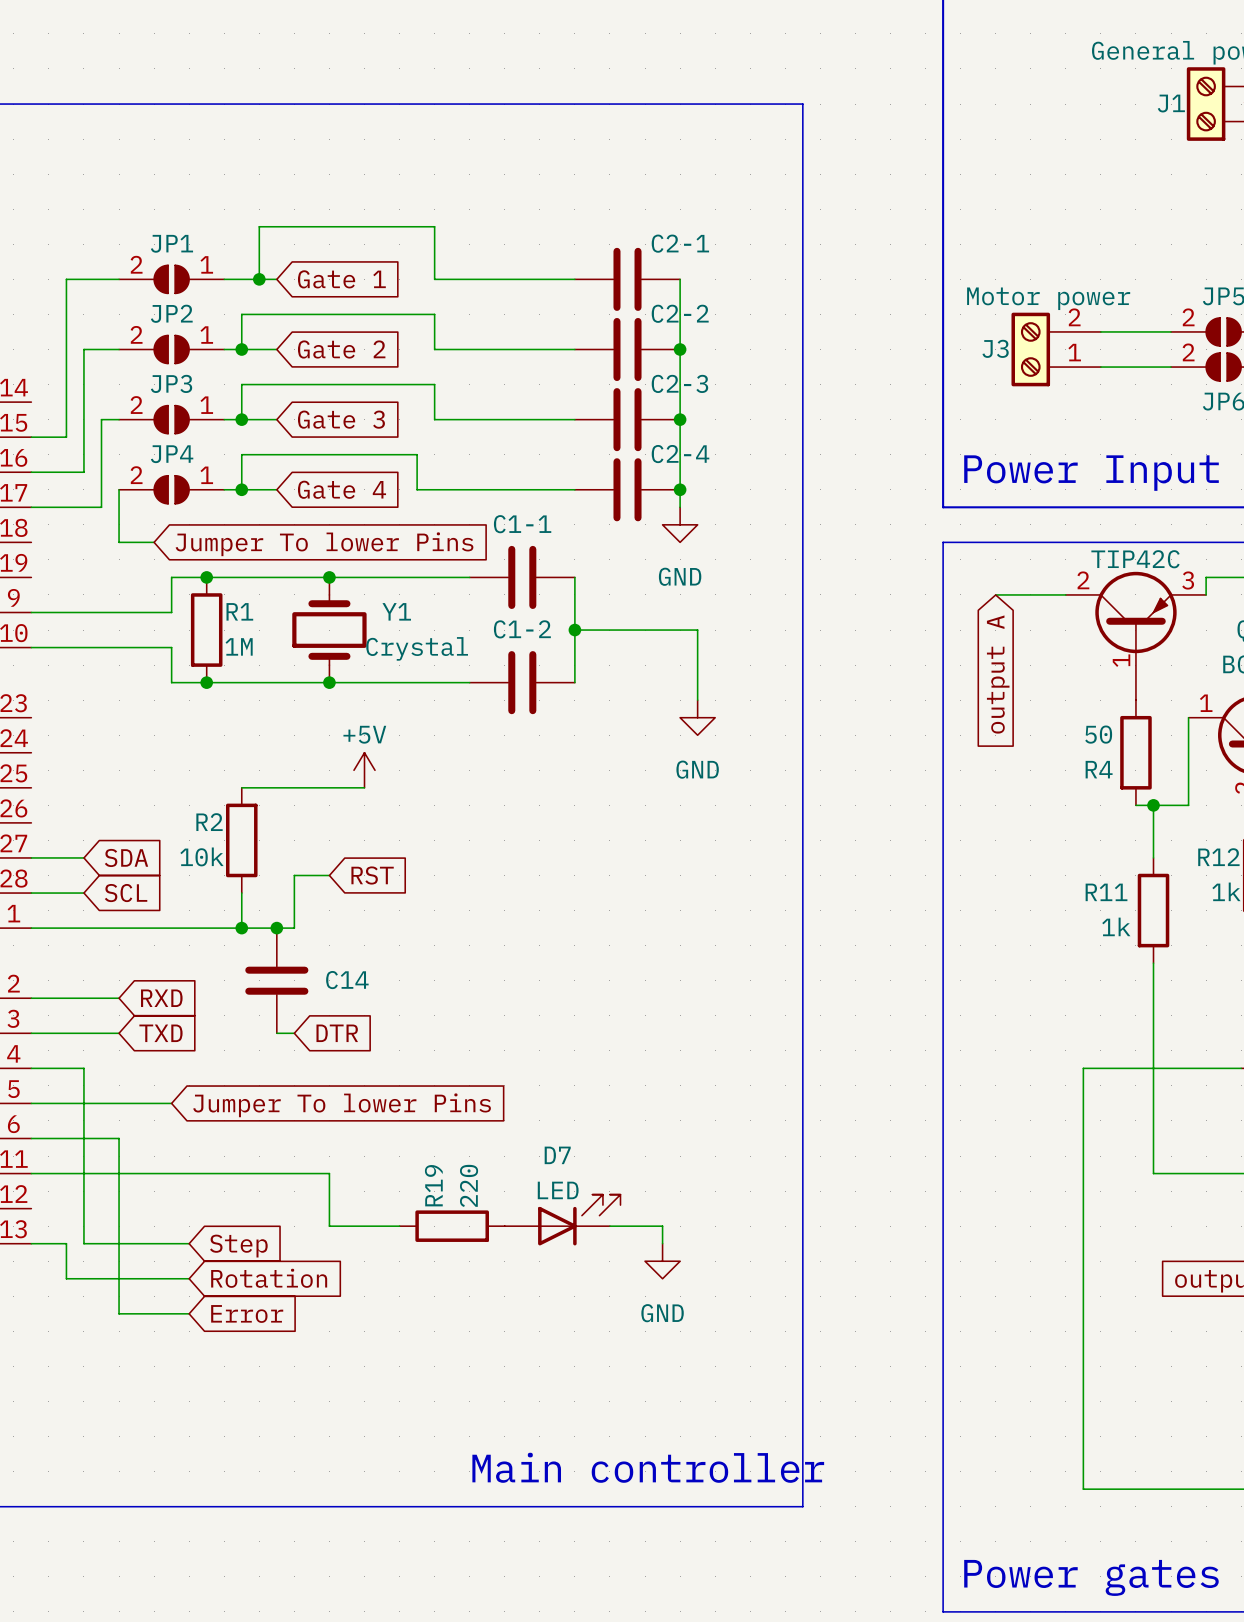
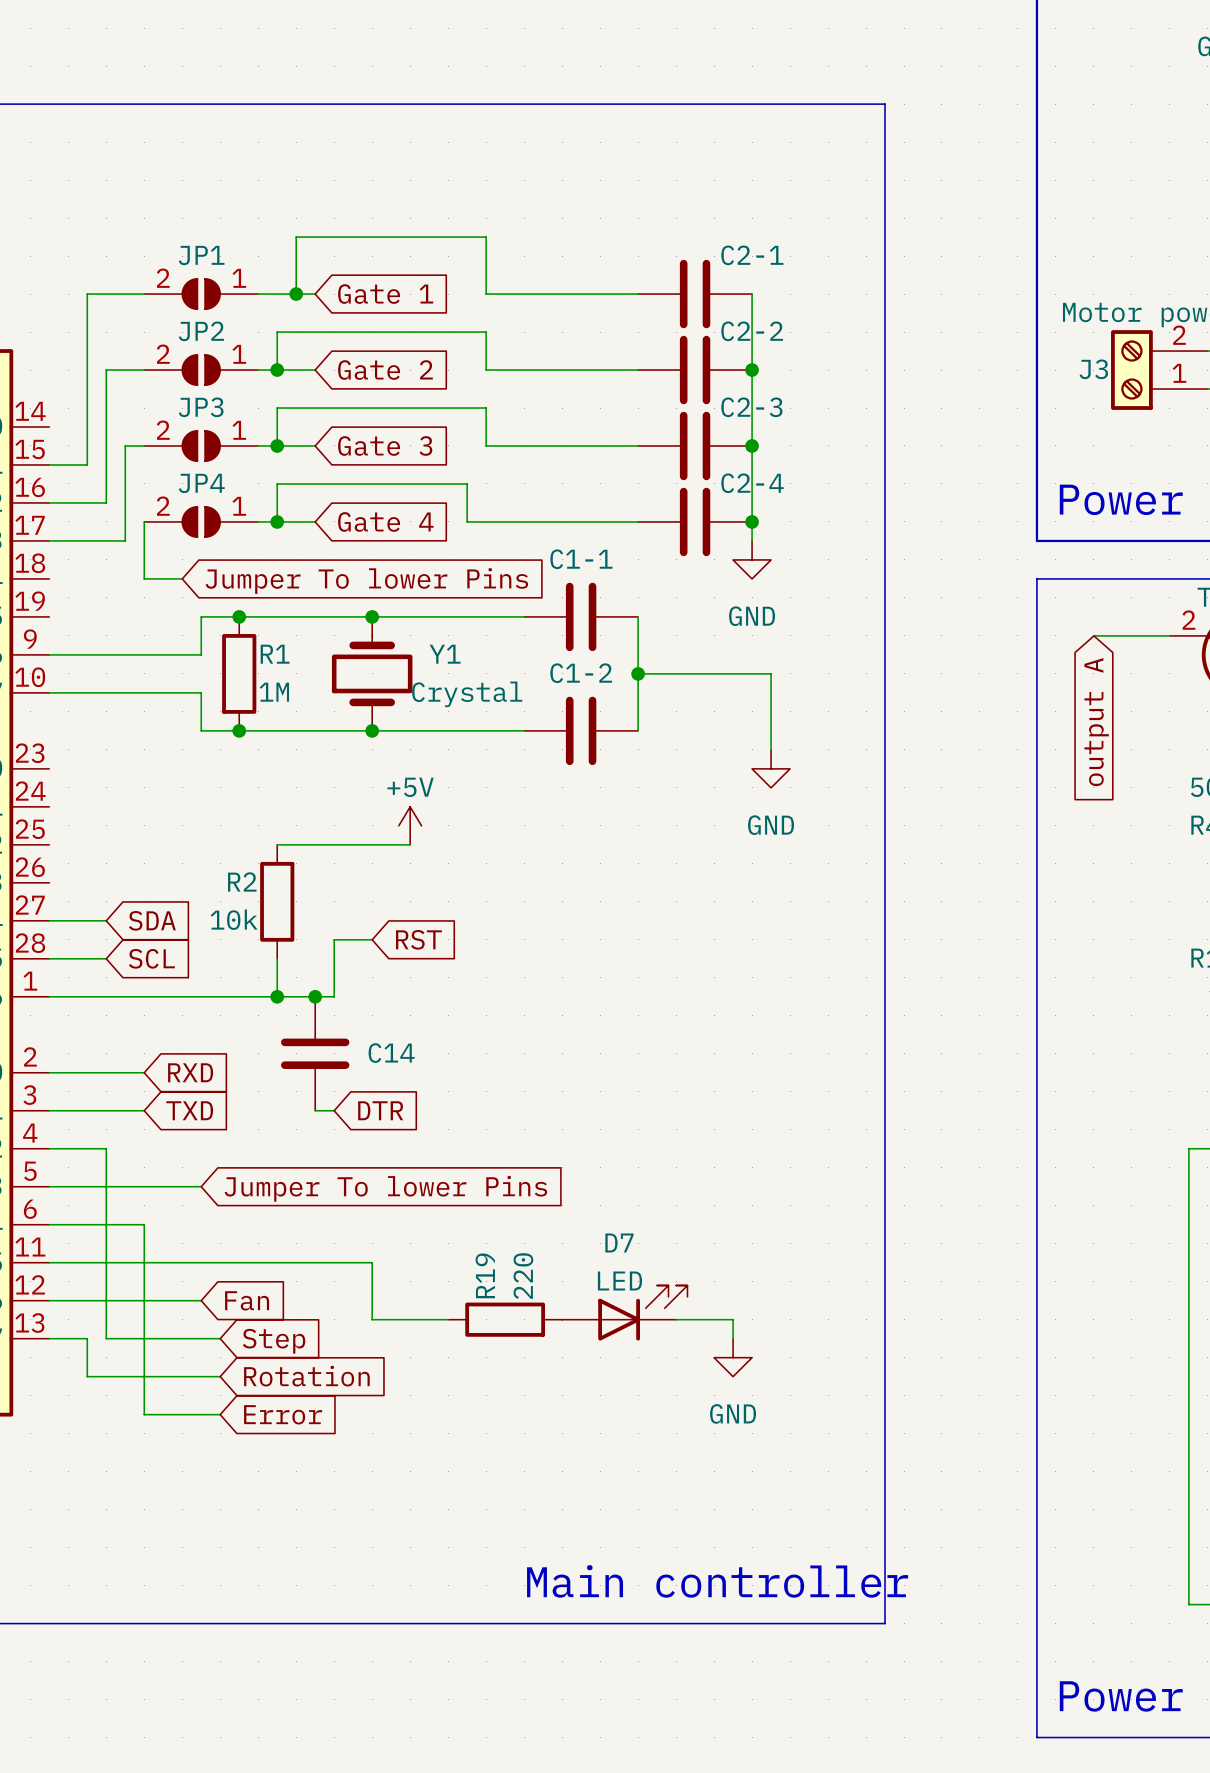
wire: none -> (49, 1300) (201, 1300)
global label: none -> Fan (247, 1300)

